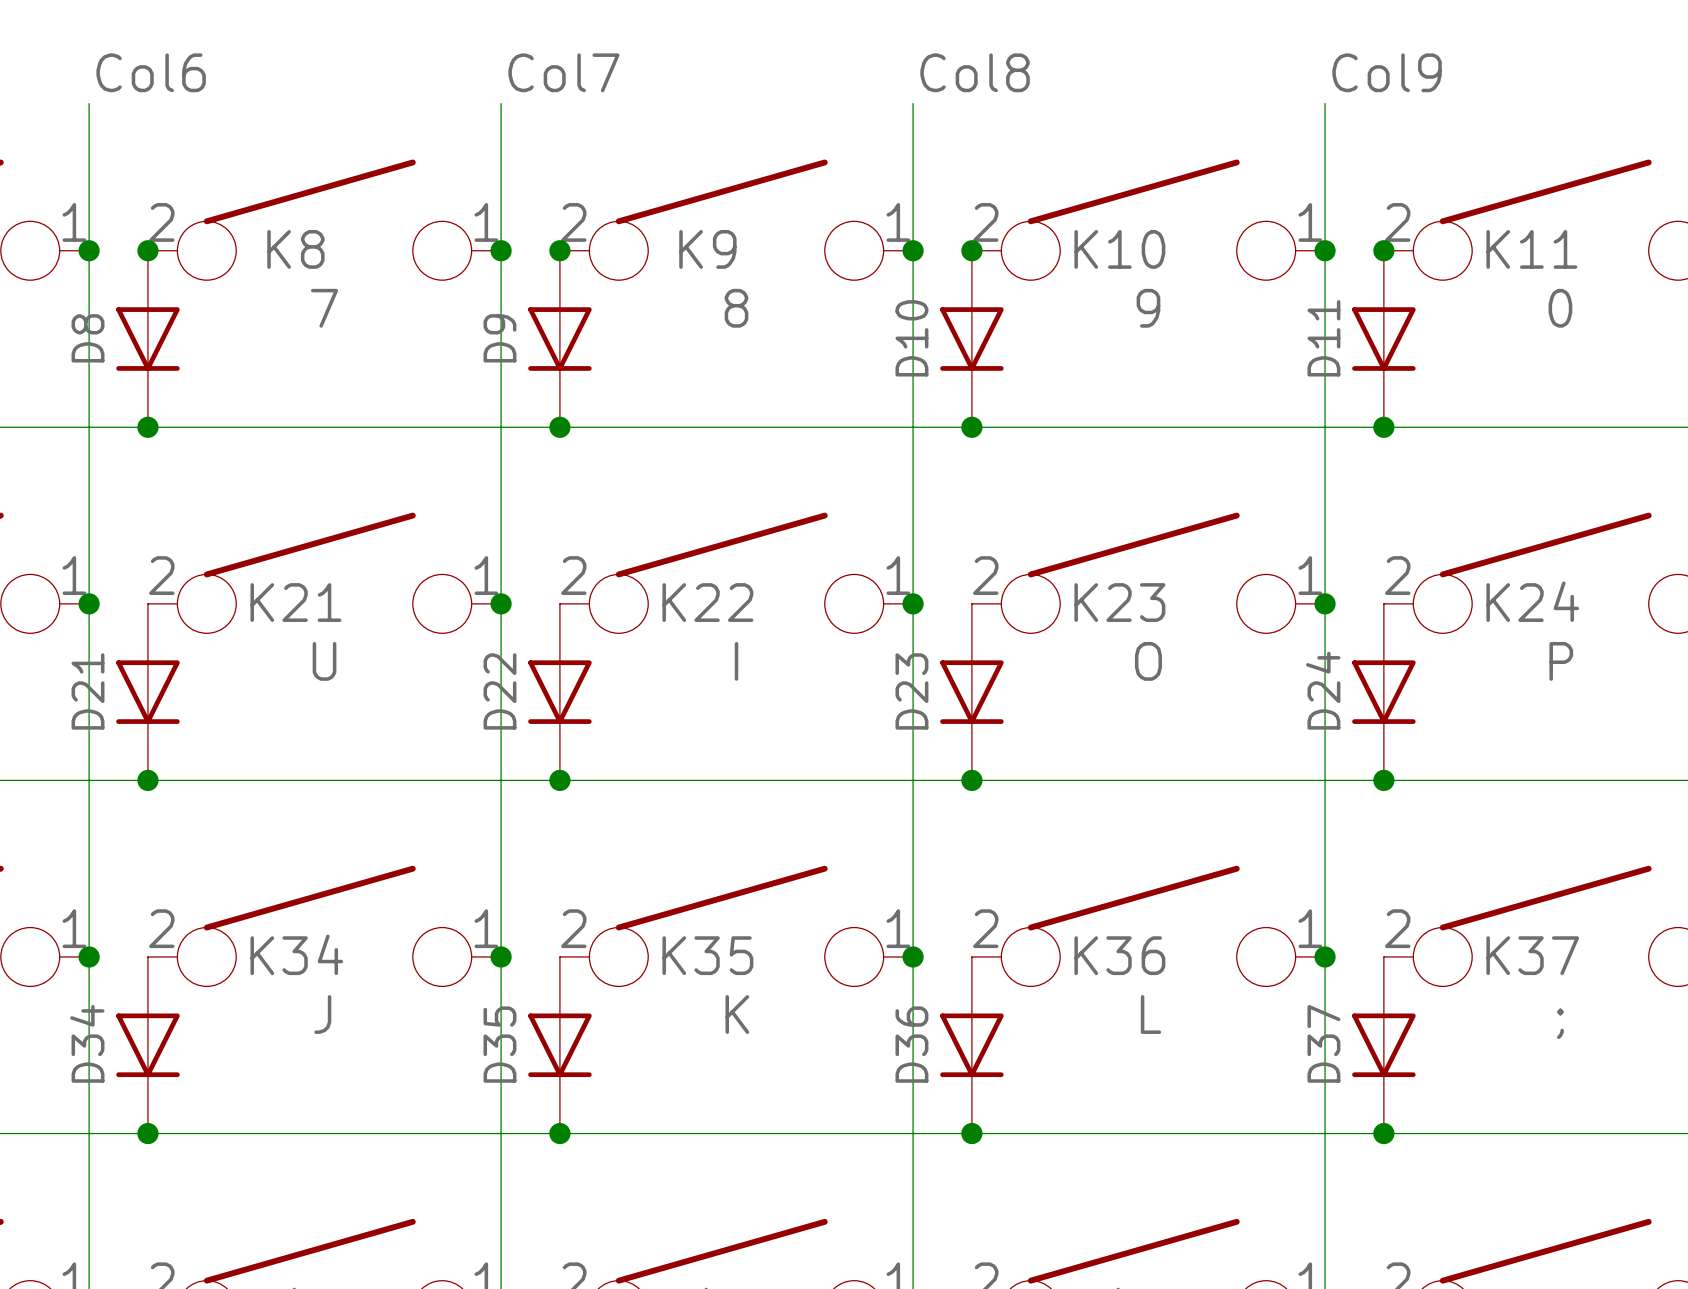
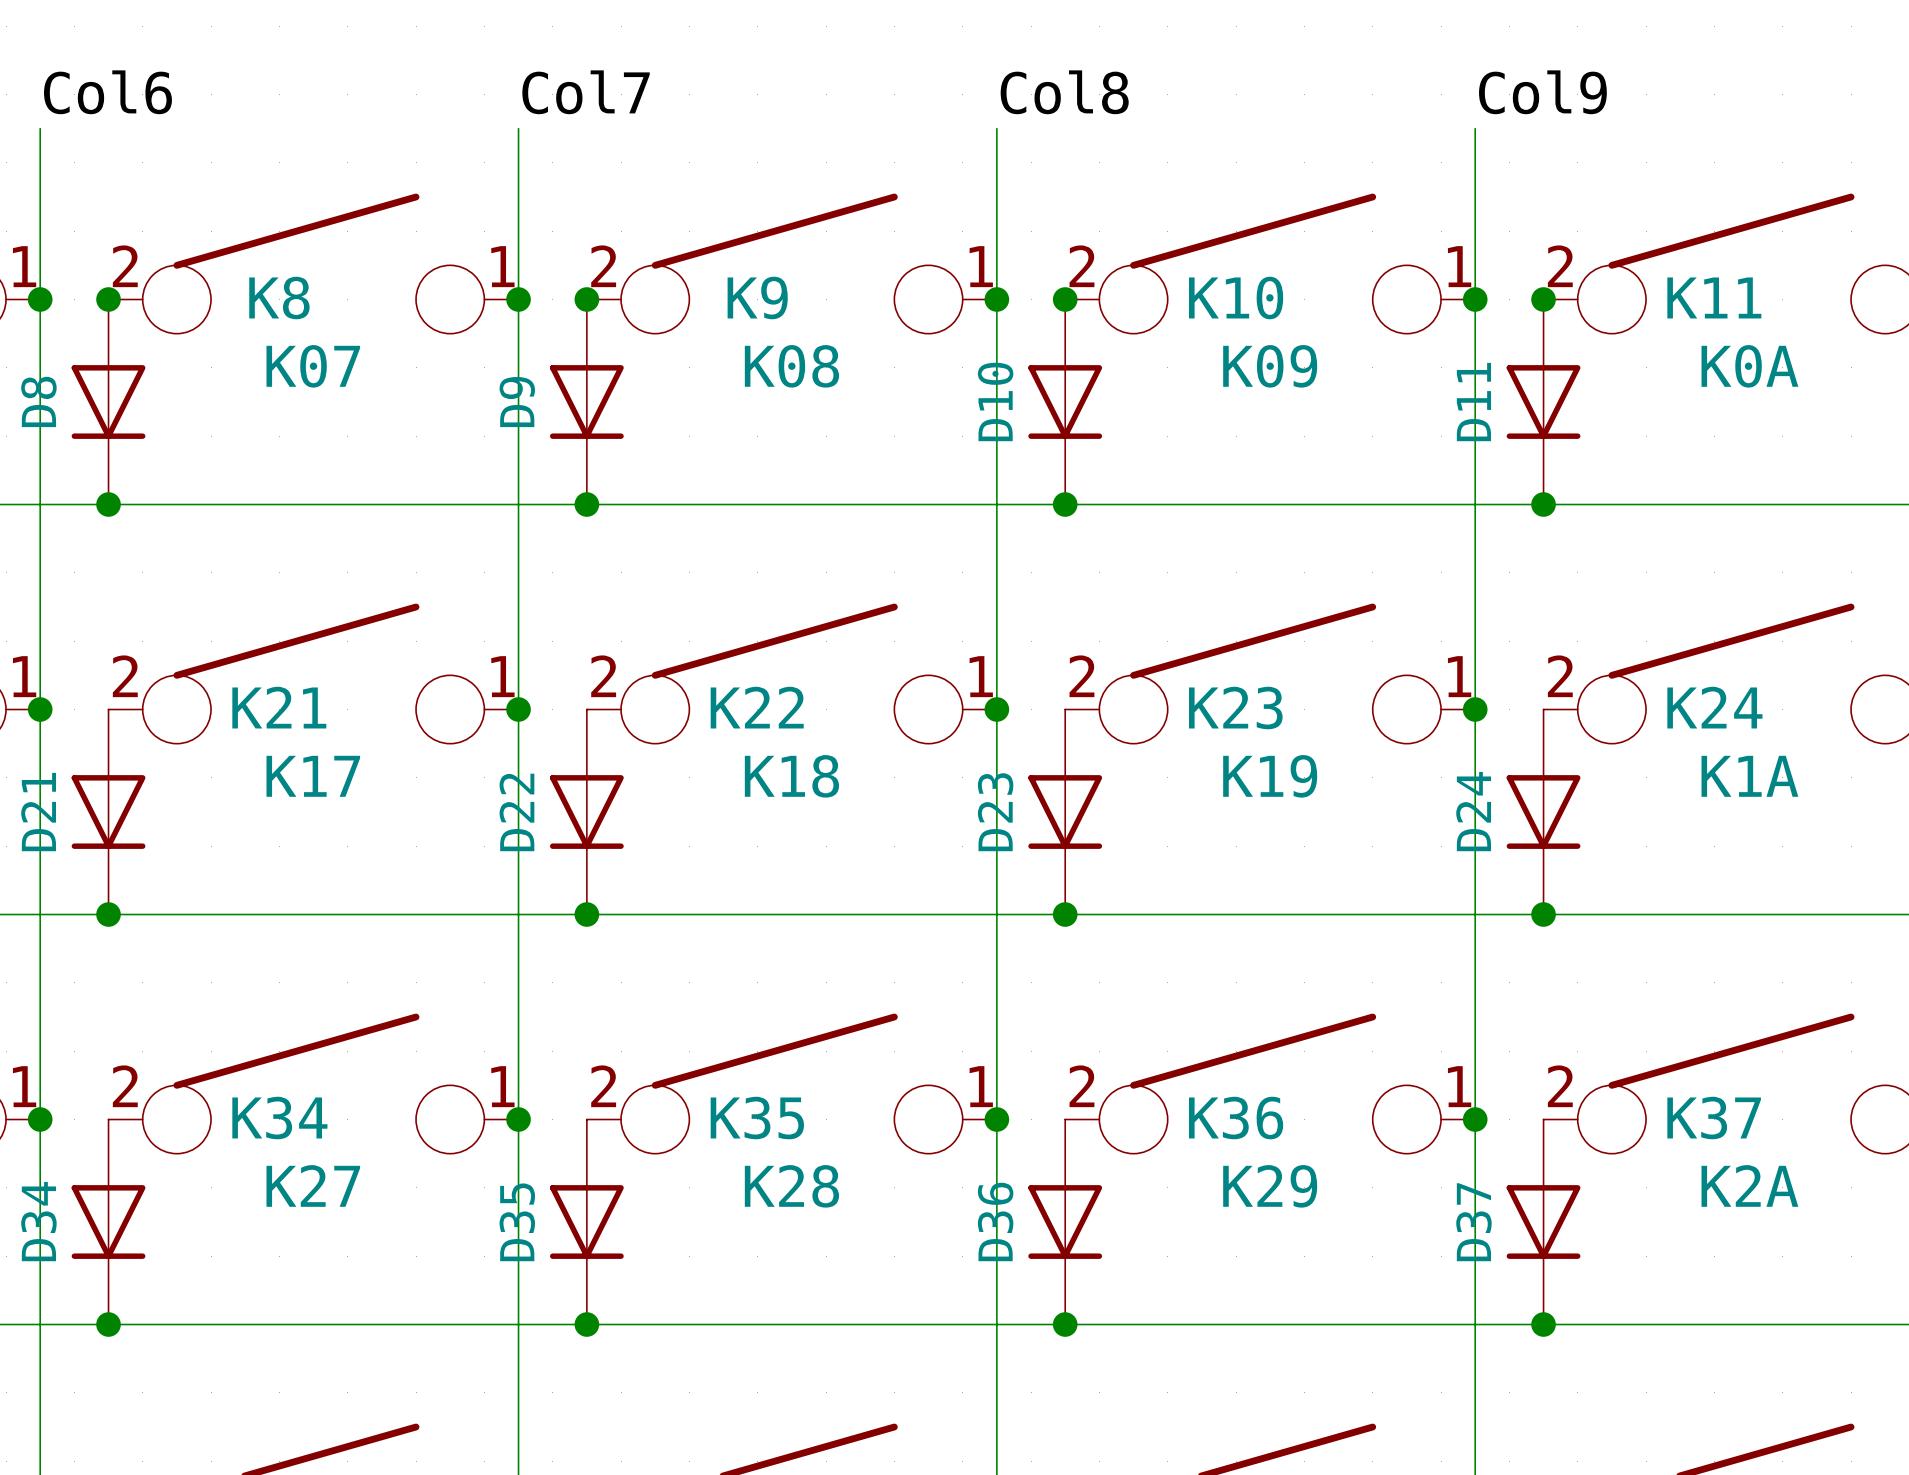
K8 value: 7 (324, 308) -> K07 (313, 366)
K9 value: 8 (736, 308) -> K08 (791, 366)
K10 value: 9 (1148, 308) -> K09 (1270, 366)
K11 value: 0 (1560, 308) -> K0A (1749, 366)
K21 value: U (324, 661) -> K17 (313, 776)
K22 value: I (736, 661) -> K18 (791, 776)
K23 value: O (1148, 661) -> K19 (1270, 776)
K24 value: P (1561, 661) -> K1A (1749, 776)
K34 value: J (322, 1014) -> K27 (313, 1185)
K35 value: K (737, 1014) -> K28 (791, 1186)
K36 value: L (1150, 1014) -> K29 (1270, 1186)
K37 value: ; (1560, 1023) -> K2A (1749, 1185)

